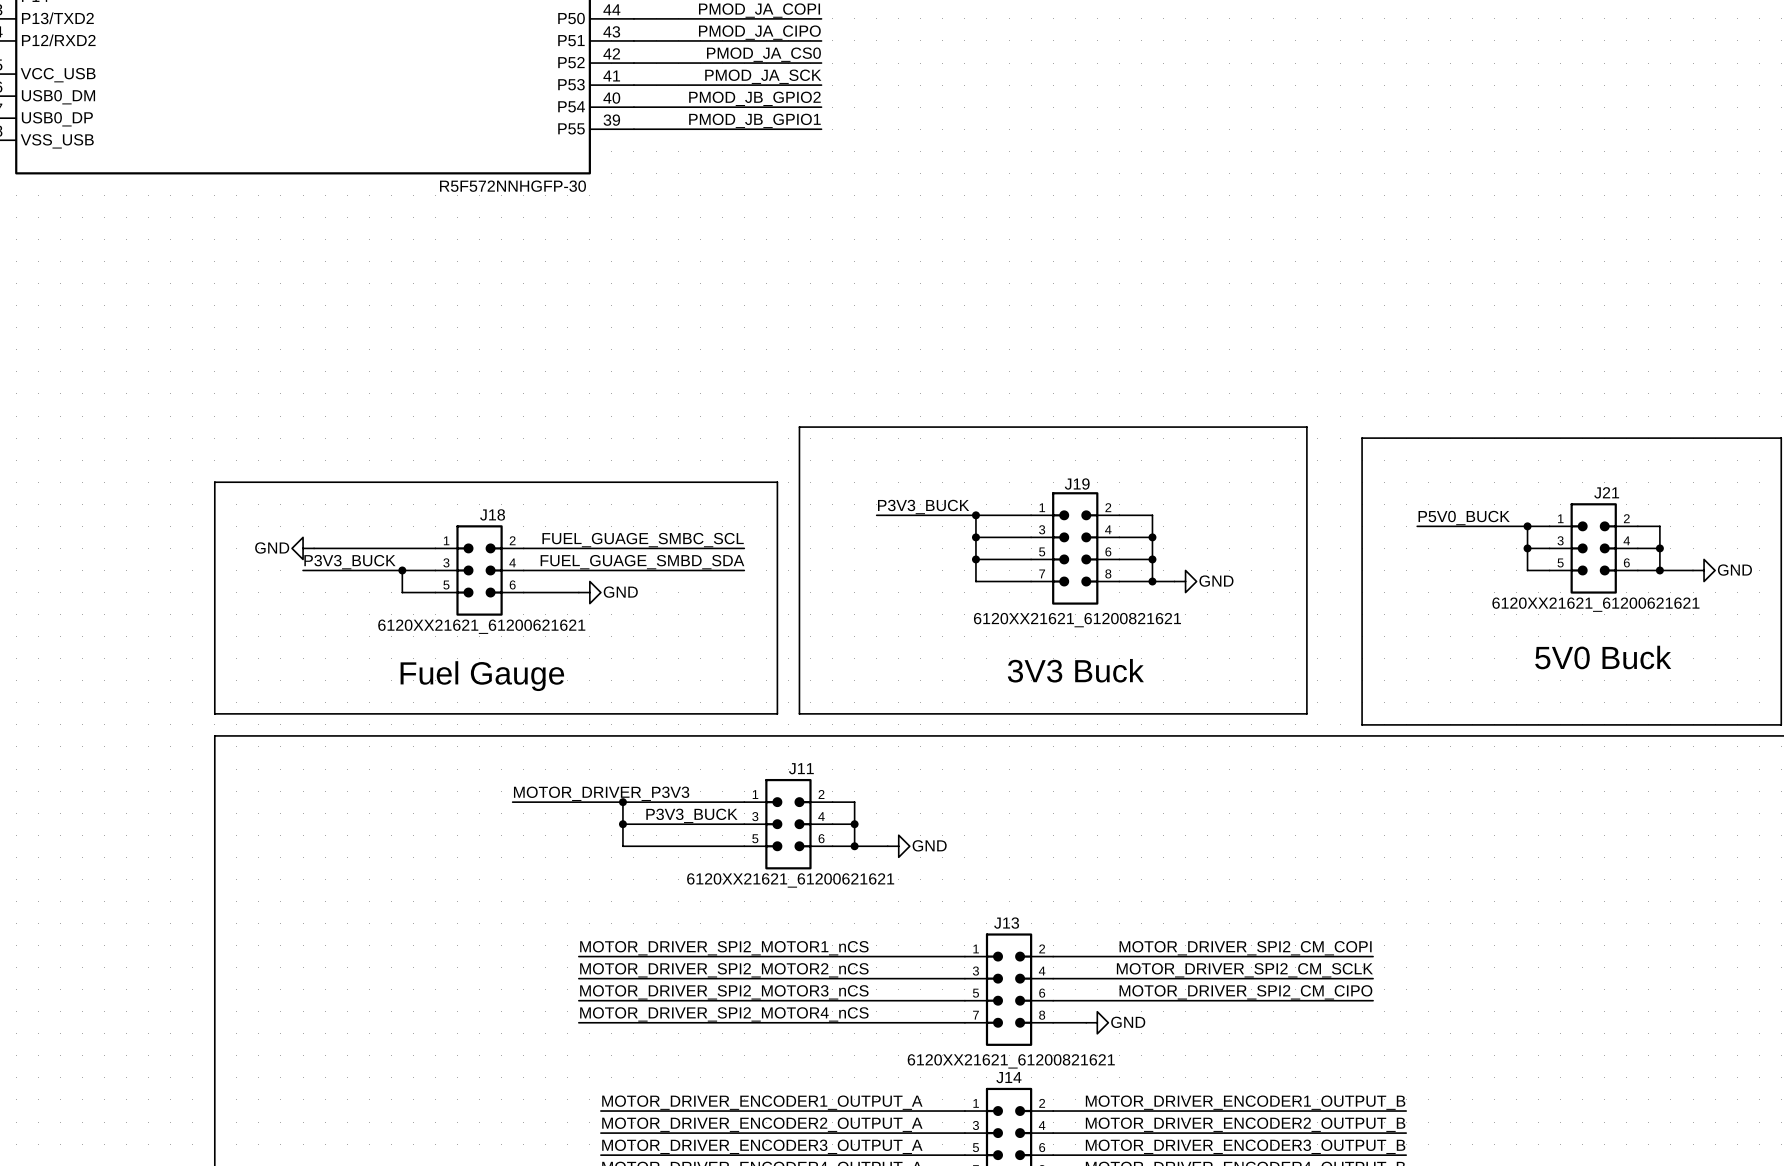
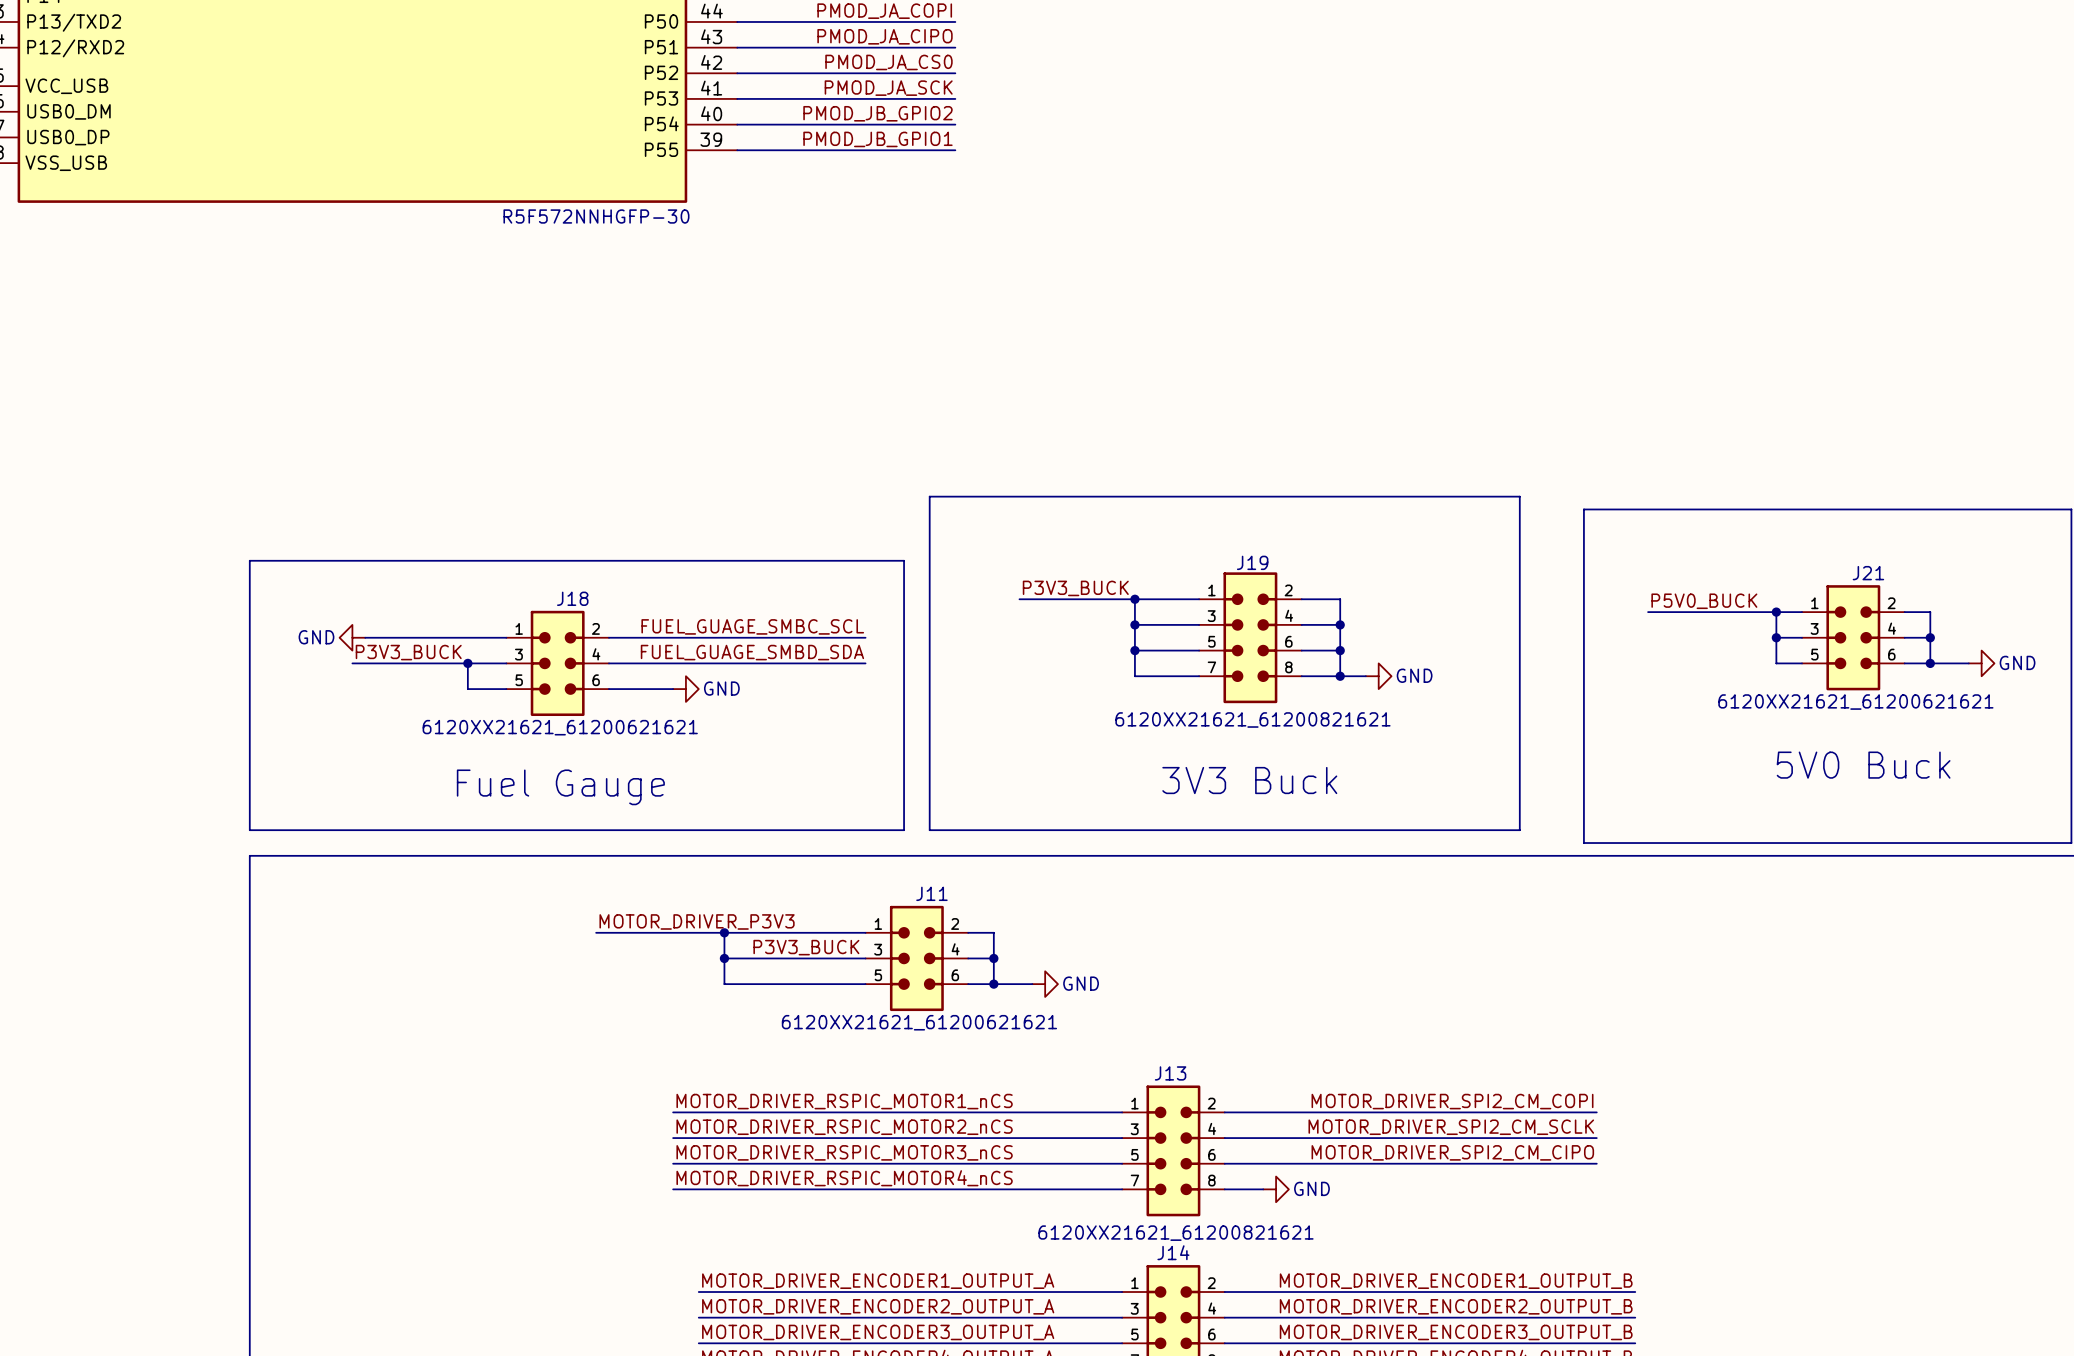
label: MOTOR_DRIVER_SPI2_MOTOR1_nCS (724, 948) -> MOTOR_DRIVER_RSPIC_MOTOR1_nCS (844, 1101)
label: MOTOR_DRIVER_SPI2_MOTOR2_nCS (724, 970) -> MOTOR_DRIVER_RSPIC_MOTOR2_nCS (844, 1127)
label: MOTOR_DRIVER_SPI2_MOTOR3_nCS (724, 992) -> MOTOR_DRIVER_RSPIC_MOTOR3_nCS (844, 1152)
label: MOTOR_DRIVER_SPI2_MOTOR4_nCS (724, 1014) -> MOTOR_DRIVER_RSPIC_MOTOR4_nCS (844, 1178)

